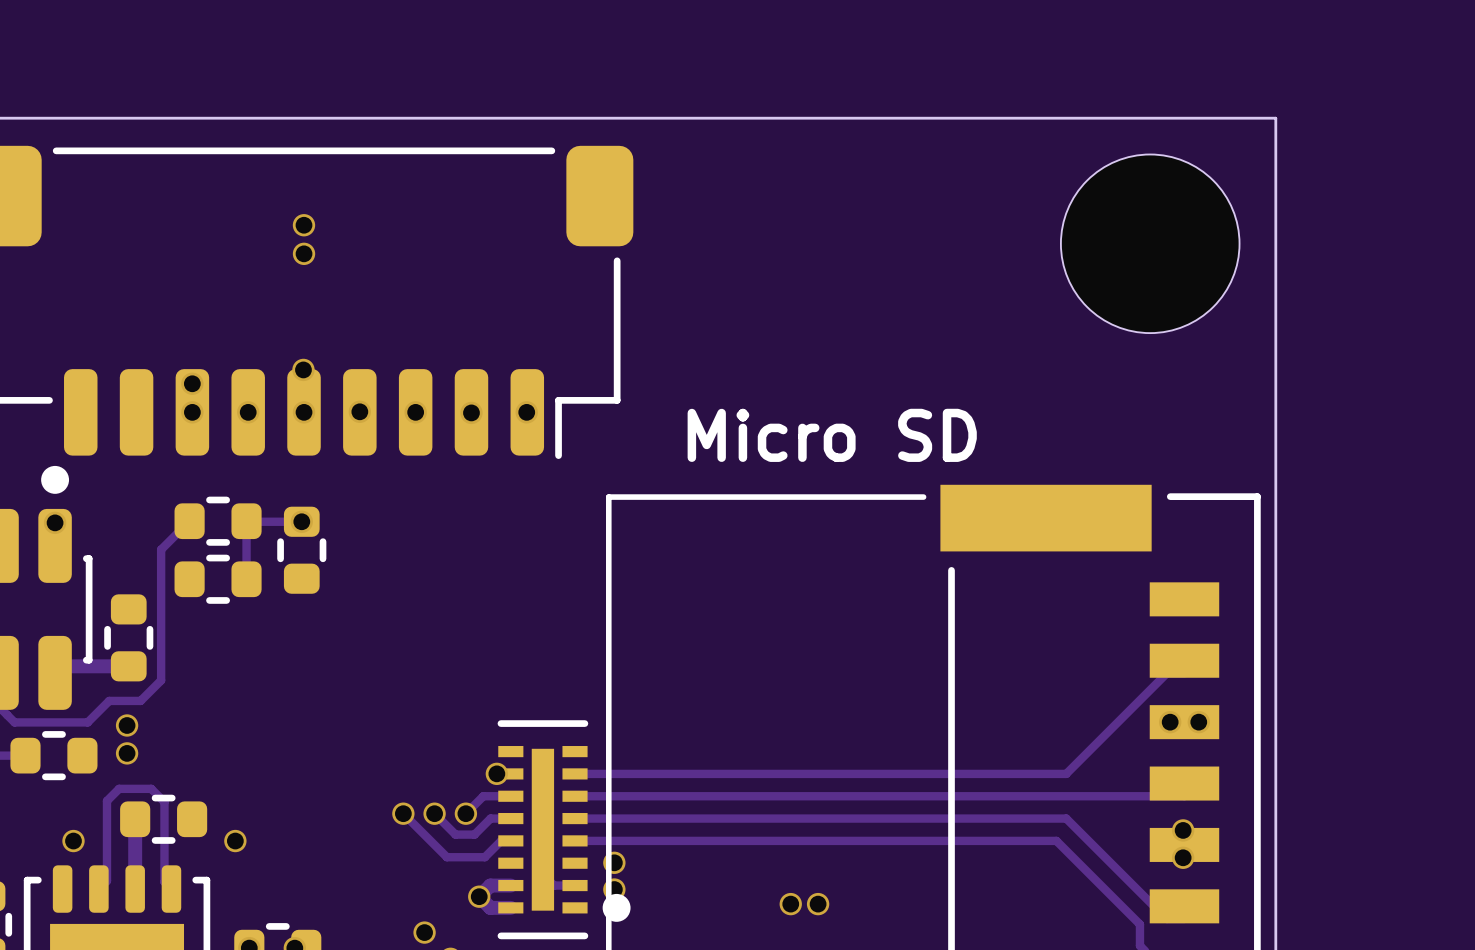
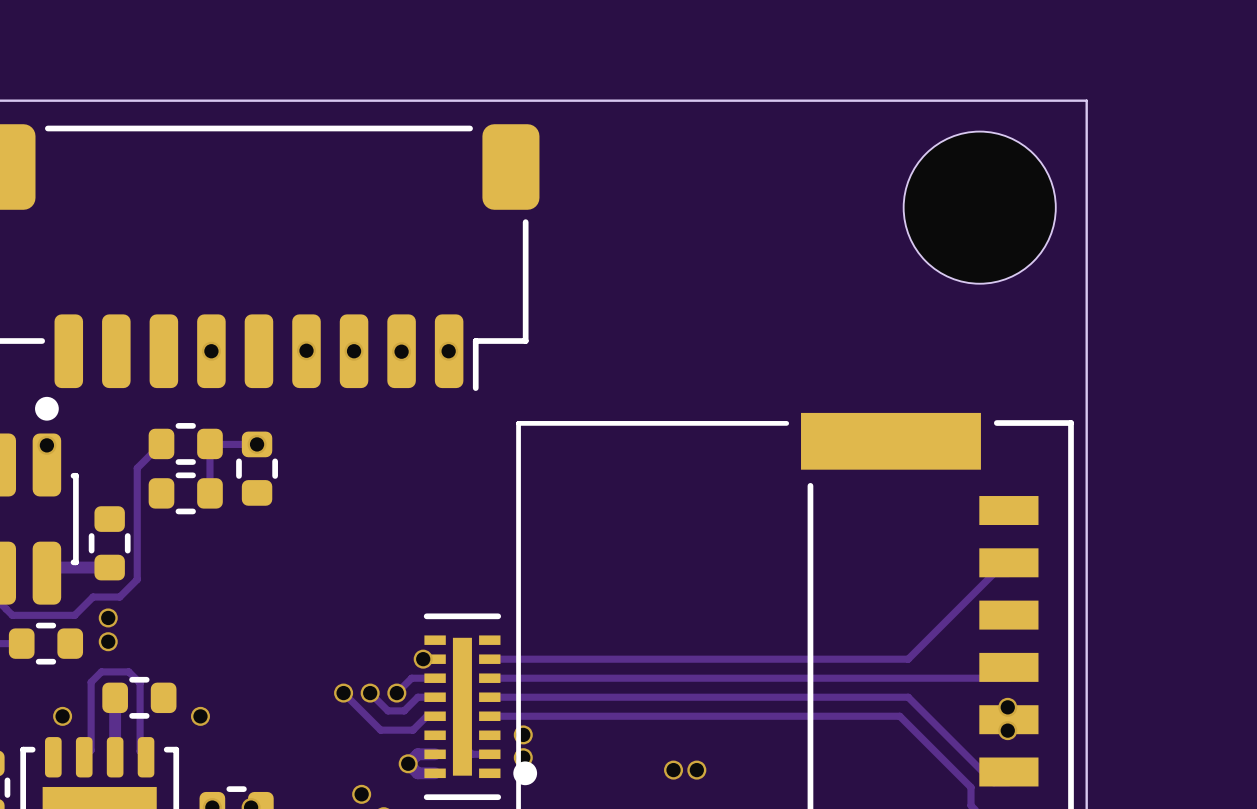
via: (303, 225) -> none
via: (304, 253) -> none
via: (303, 369) -> none
via: (192, 383) -> none
via: (192, 412) -> none
via: (304, 412) -> none
text: Micro SD (832, 435) -> none
via: (1170, 722) -> none
via: (1198, 722) -> none

